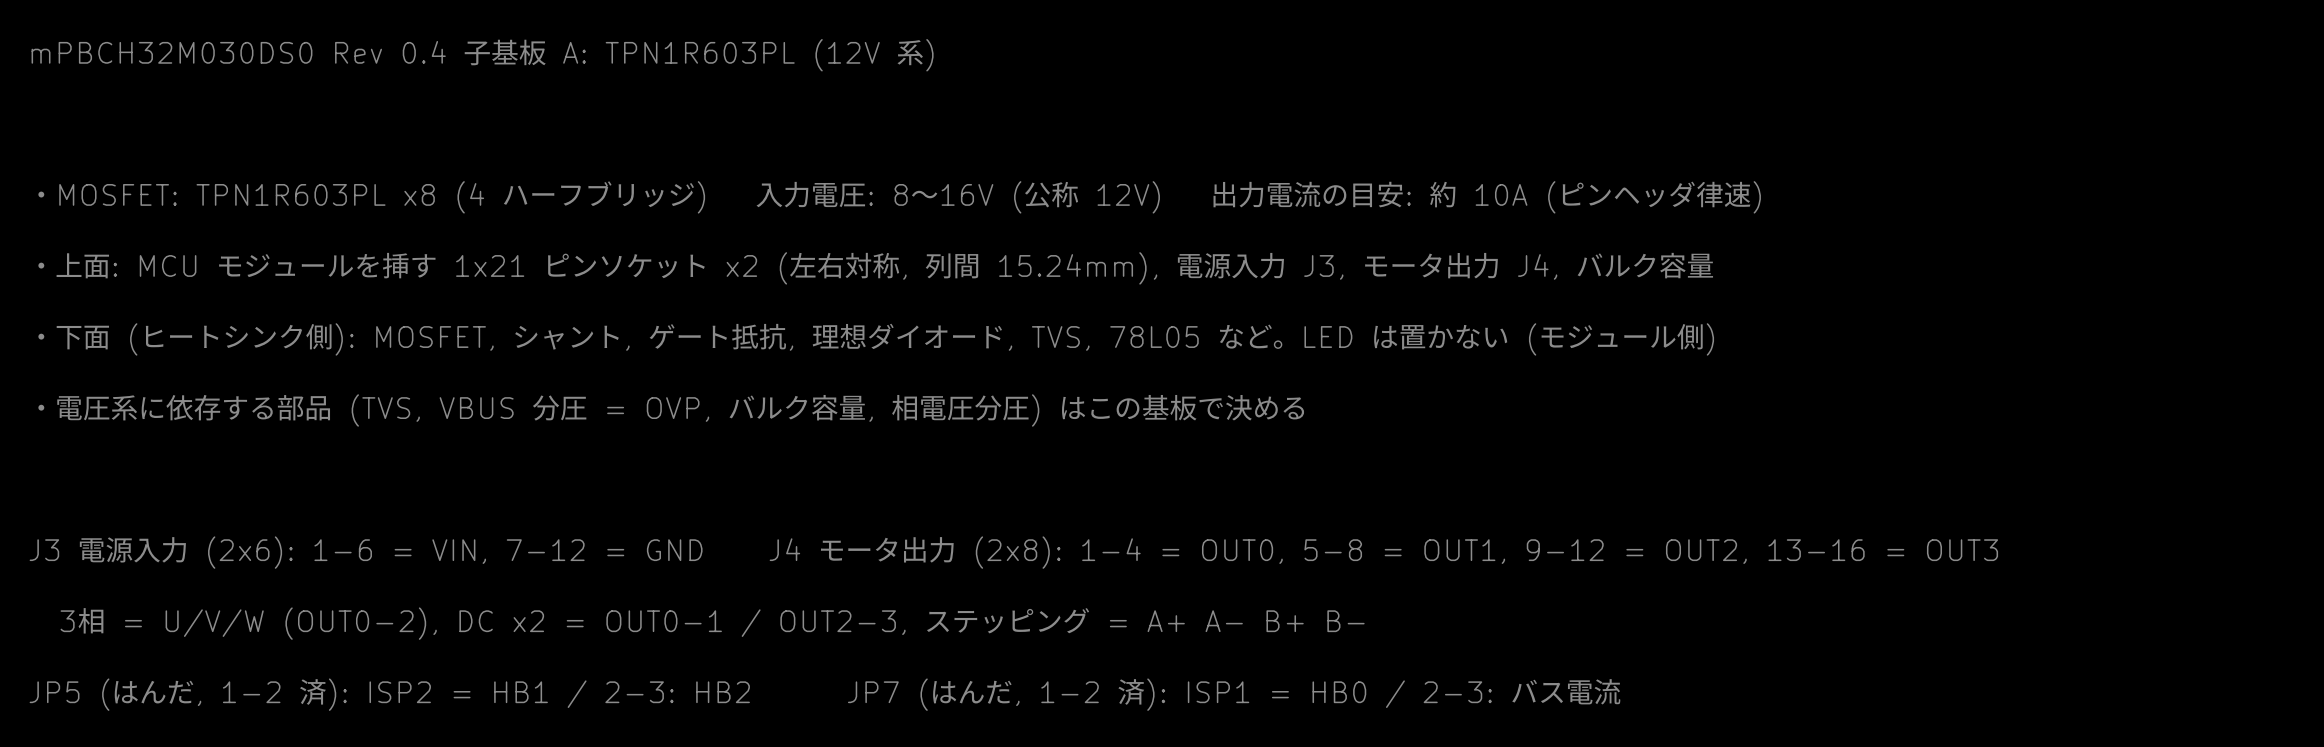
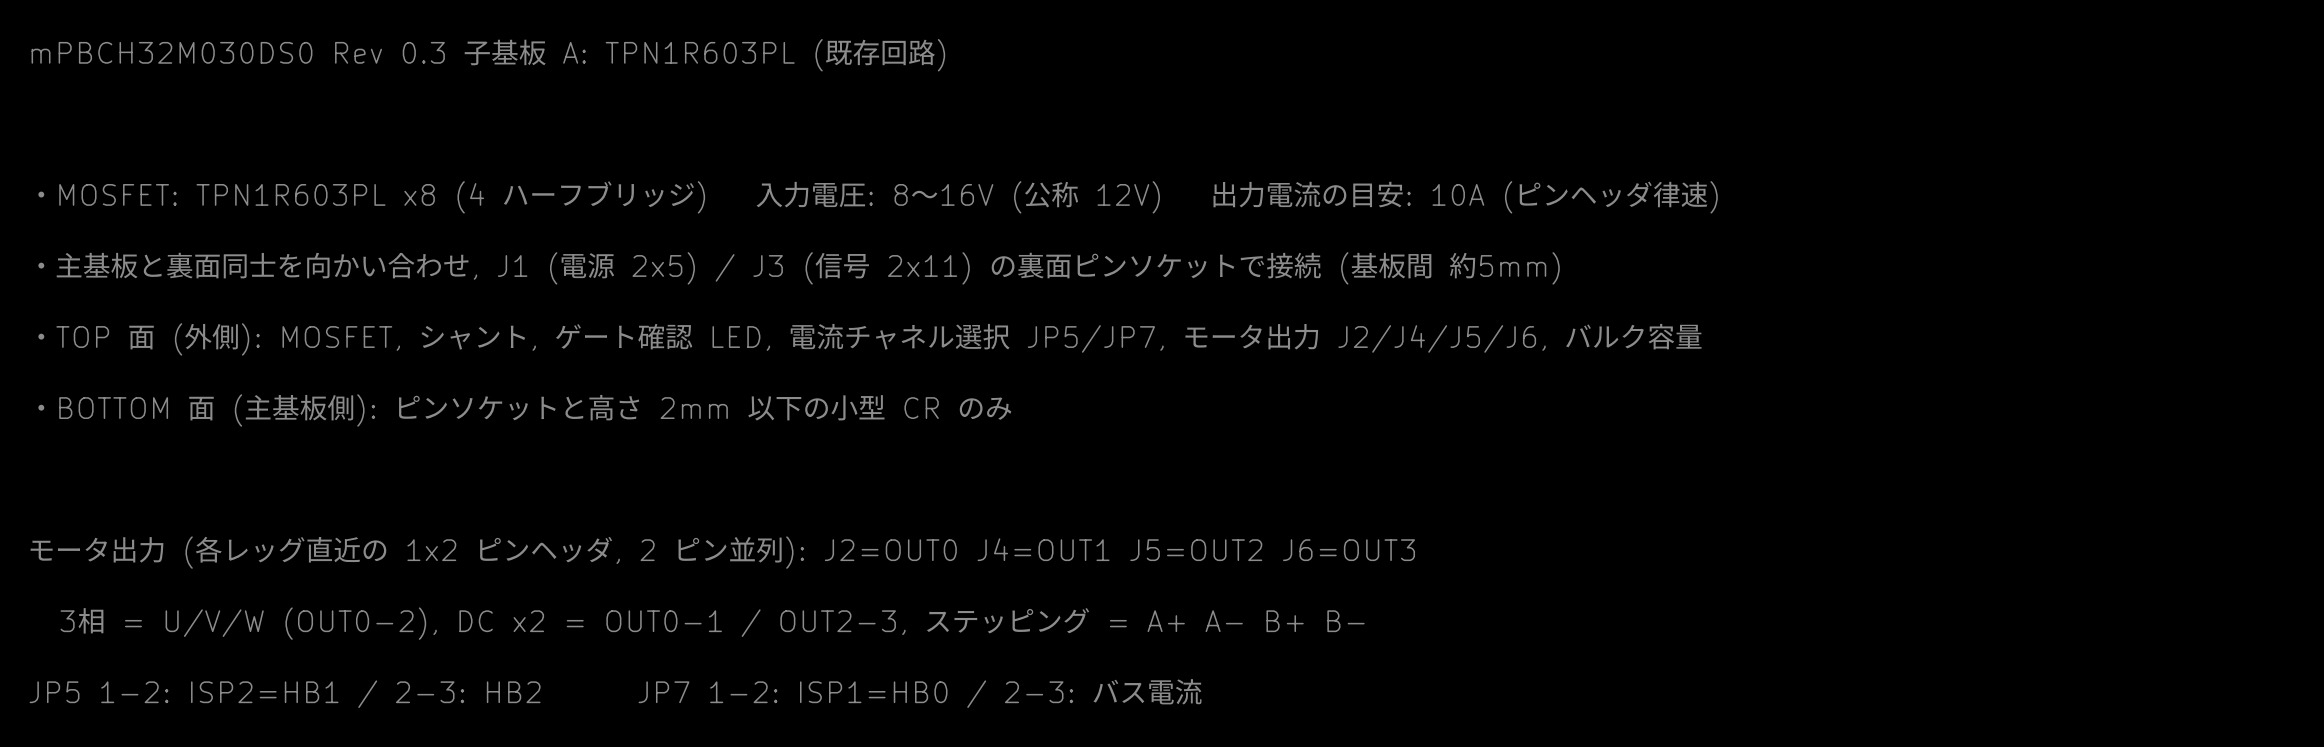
text: mPBCH32M030DS0 Rev 0.4 子基板 A: TPN1R603PL (12V 系) (482, 55) -> mPBCH32M030DS0 Rev 0.3 子基板 A: TPN1R603PL (既存回路) (488, 55)
text: ・MOSFET: TPN1R603PL x8 (4 ハーフブリッジ) 入力電圧: 8〜16V (公称 12V) 出力電流の目安: 約 10A (ピンヘッダ律速) (899, 197) -> ・MOSFET: TPN1R603PL x8 (4 ハーフブリッジ) 入力電圧: 8〜16V (公称 12V) 出力電流の目安: 10A (ピンヘッダ律速) (877, 197)
text: ・上面: MCU モジュールを挿す 1x21 ピンソケット x2 (左右対称, 列間 15.24mm), 電源入力 J3, モータ出力 J4, バルク容量 (875, 268) -> ・主基板と裏面同士を向かい合わせ, J1 (電源 2x5) / J3 (信号 2x11) の裏面ピンソケットで接続 (基板間 約5mm) (798, 268)
text: ・下面 (ヒートシンク側): MOSFET, シャント, ゲート抵抗, 理想ダイオード, TVS, 78L05 など。LED は置かない (モジュール側) (875, 339) -> ・TOP 面 (外側): MOSFET, シャント, ゲート確認 LED, 電流チャネル選択 JP5/JP7, モータ出力 J2/J4/J5/J6, バルク容量 (869, 339)
text: ・電圧系に依存する部品 (TVS, VBUS 分圧 = OVP, バルク容量, 相電圧分圧) はこの基板で決める (671, 410) -> ・BOTTOM 面 (主基板側): ピンソケットと高さ 2mm 以下の小型 CR のみ (524, 410)
text: J3 電源入力 (2x6): 1-6 = VIN, 7-12 = GND J4 モータ出力 (2x8): 1-4 = OUT0, 5-8 = OUT1, 9-12 = OUT2, 13-16 = OUT3 (1013, 552) -> モータ出力 (各レッグ直近の 1x2 ピンヘッダ, 2 ピン並列): J2=OUT0 J4=OUT1 J5=OUT2 J6=OUT3 (722, 552)
text: JP5 (はんだ, 1-2 済): ISP2 = HB1 / 2-3: HB2 JP7 (はんだ, 1-2 済): ISP1 = HB0 / 2-3: バス電流 (825, 694) -> JP5 1-2: ISP2=HB1 / 2-3: HB2 JP7 1-2: ISP1=HB0 / 2-3: バス電流 (615, 693)

